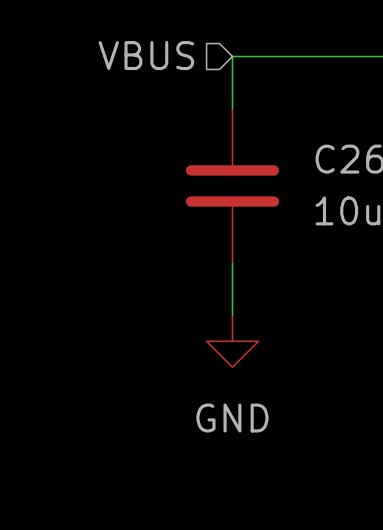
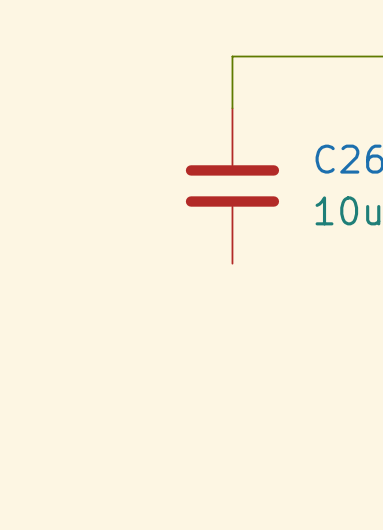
hierarchical label: VBUS (146, 55) -> none
wire: (232, 263) (232, 315) -> none
power symbol: GND (232, 341) -> none

